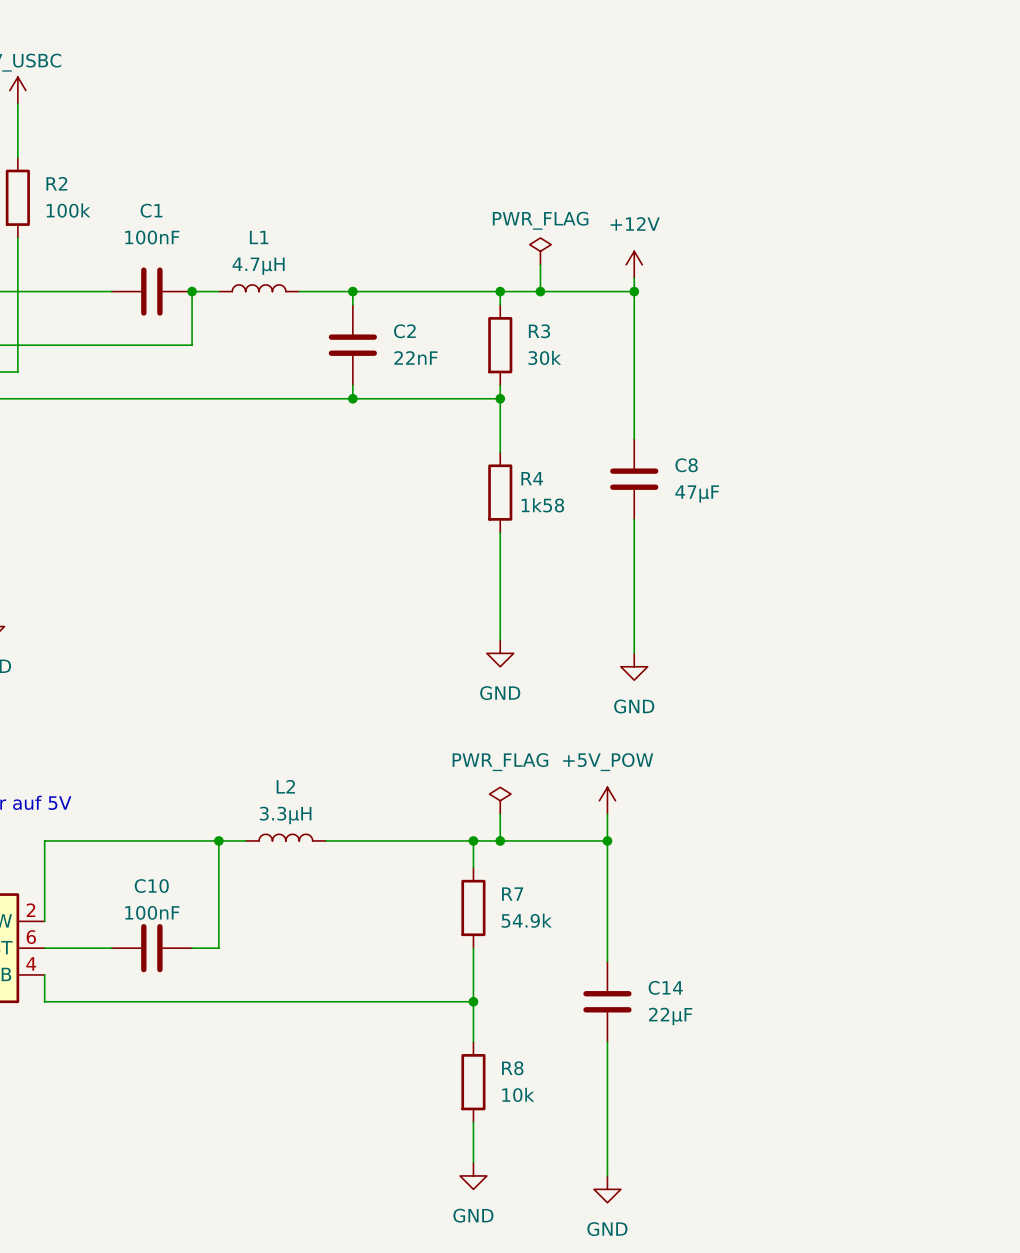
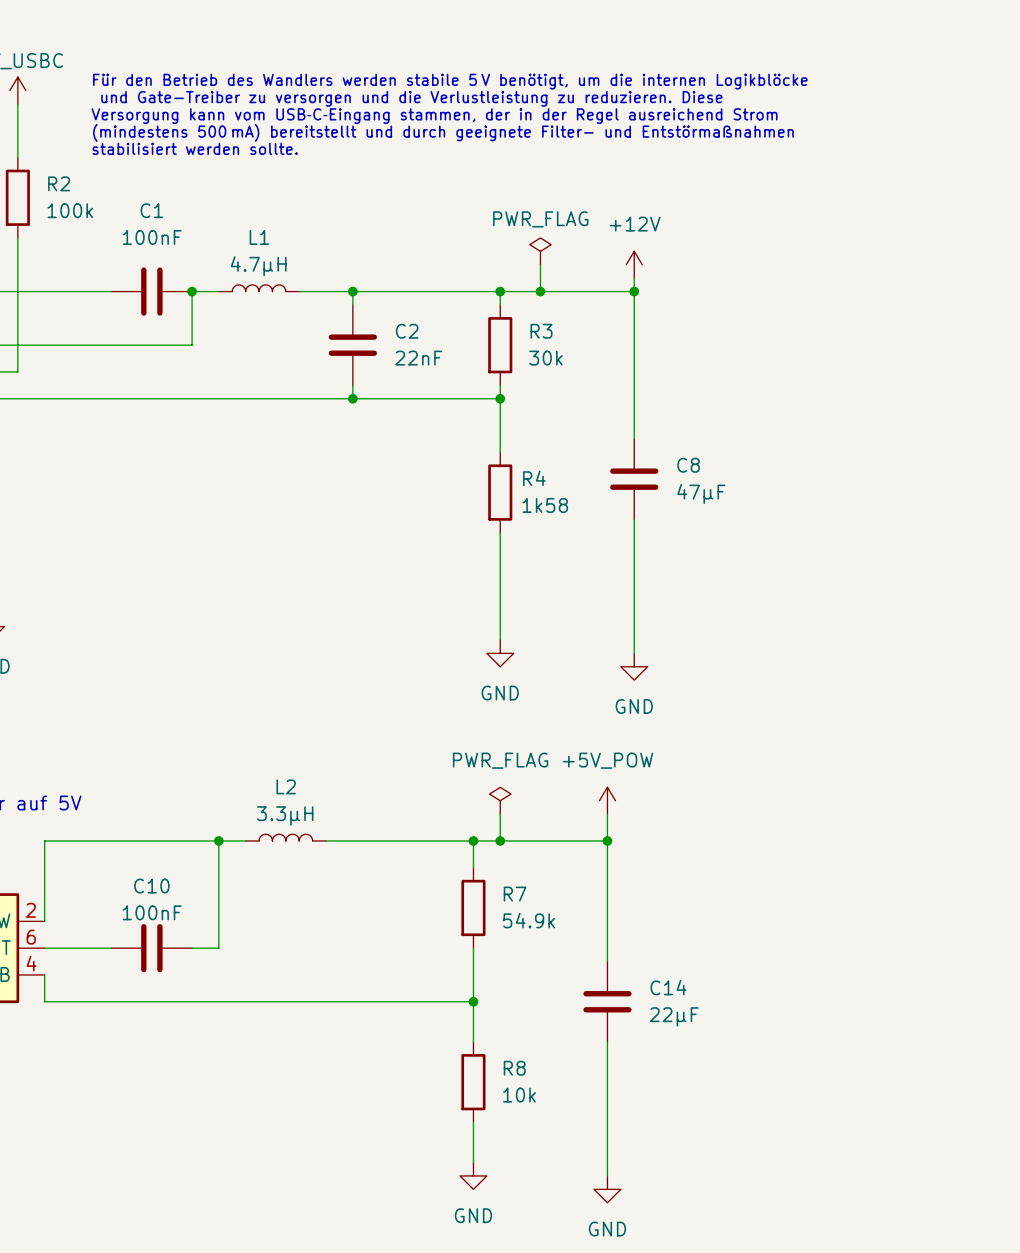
text: none -> Für den Betrieb des Wandlers werden stabile 5 V benötigt, um die internen Logikblöcke (450, 81)
text: none -> und Gate-Treiber zu versorgen und die Verlustleistung zu reduzieren. Diese (411, 98)
text: none -> Versorgung kann vom USB‑C‑Eingang stammen, der in der Regel ausreichend Strom (434, 116)
text: none -> (mindestens 500 mA) bereitstellt und durch geeignete Filter- und Entstörmaßnahmen (443, 132)
text: none -> stabilisiert werden sollte. (195, 148)

